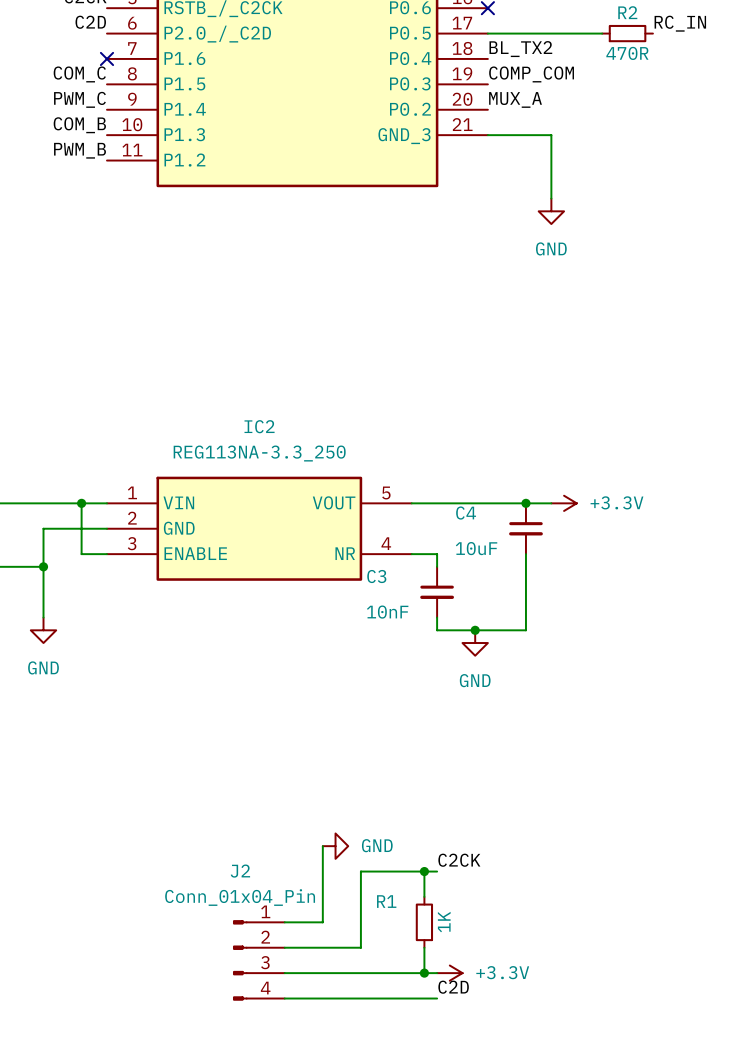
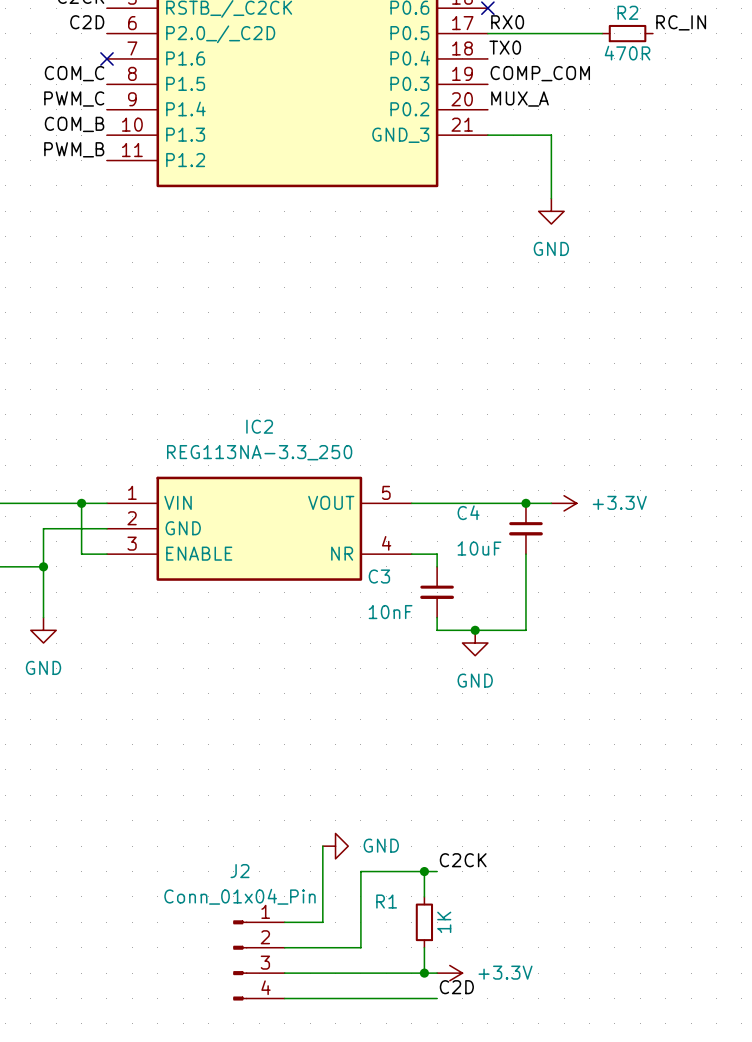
label: none -> RX0 (507, 22)
label: BL_TX2 (520, 49) -> TX0 (505, 47)

